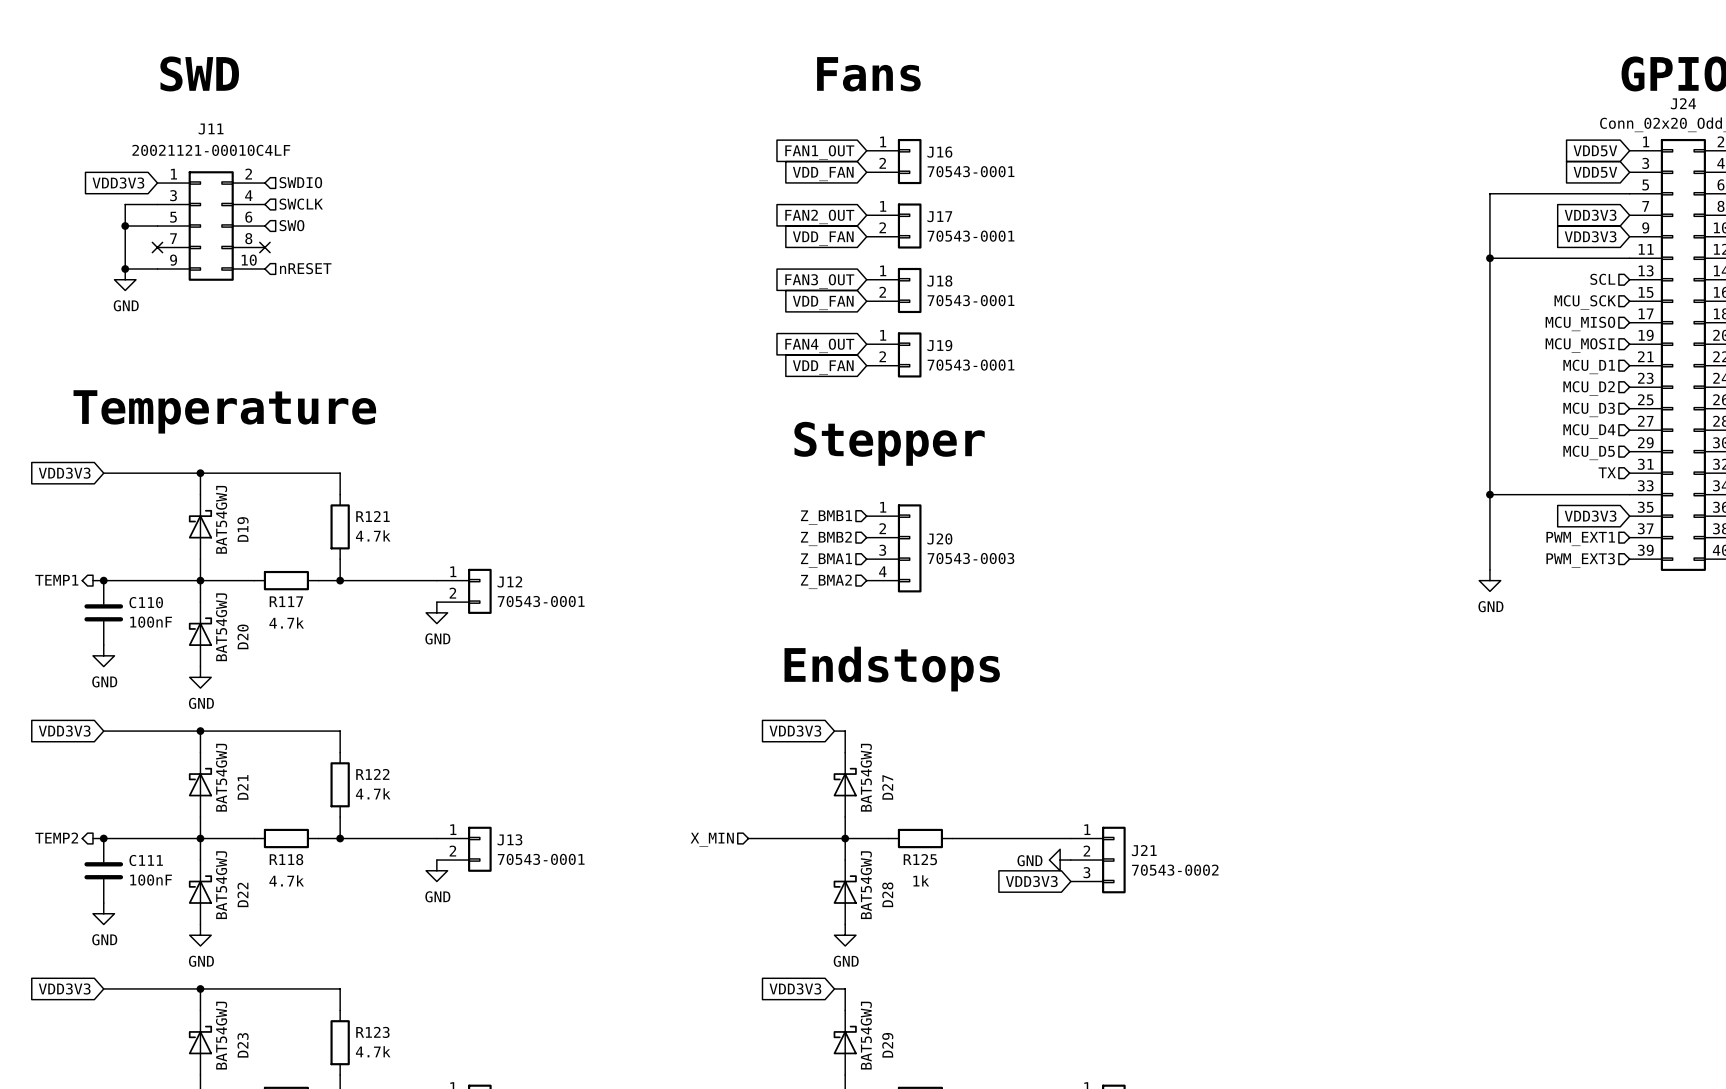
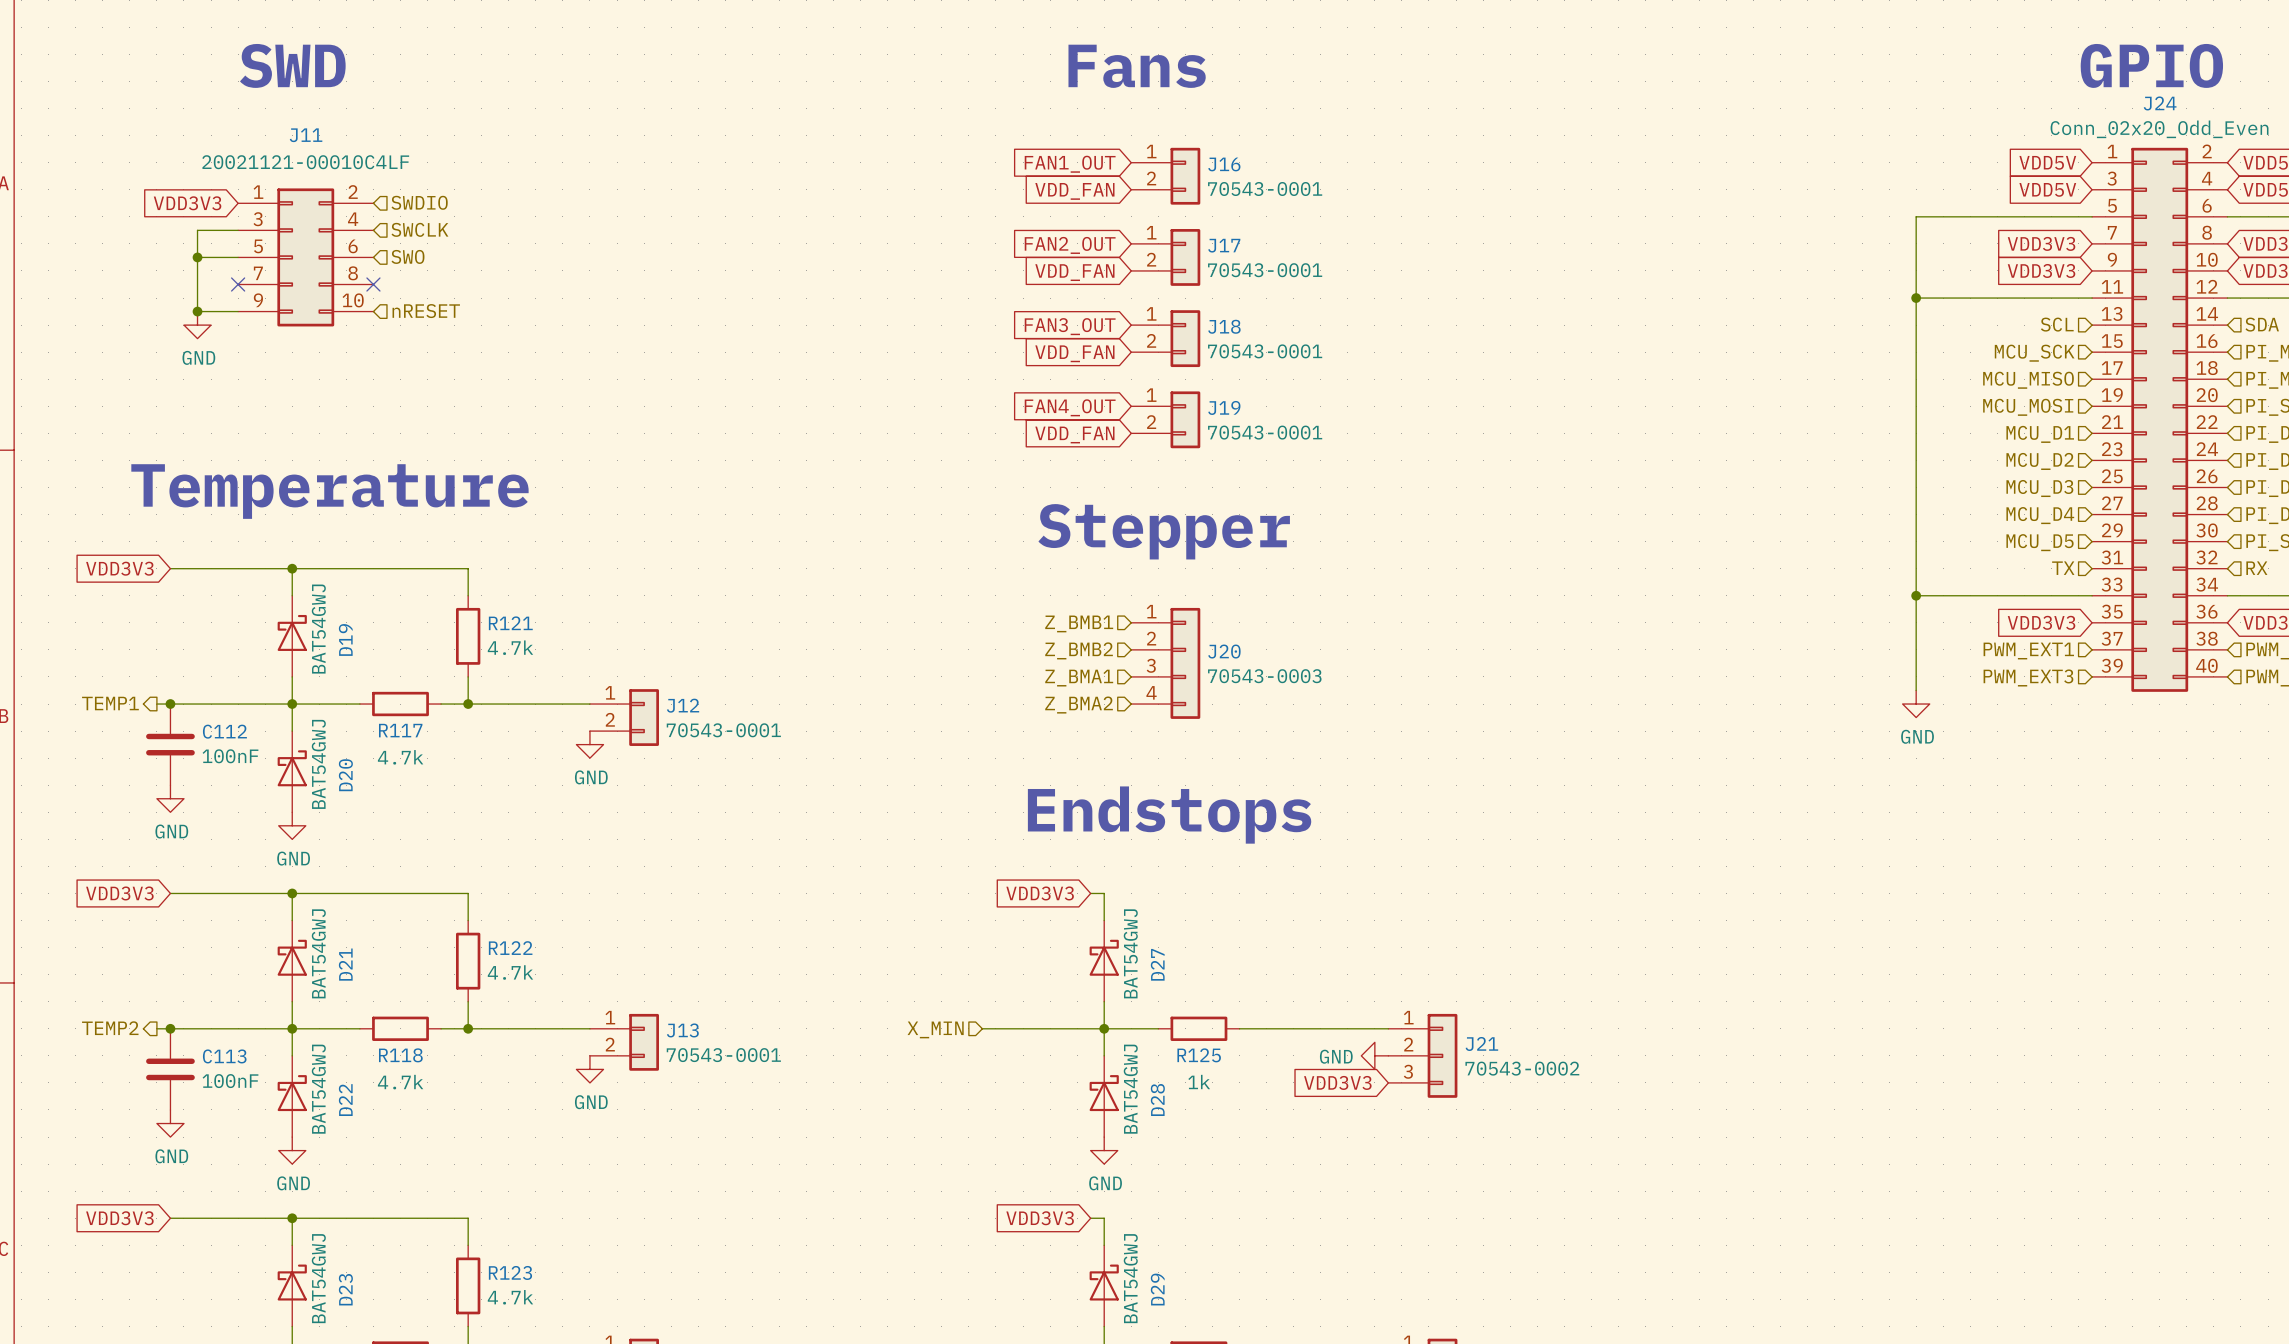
C110 name: C110 (146, 602) -> C112 (224, 731)
C111 name: C111 (146, 860) -> C113 (224, 1056)

